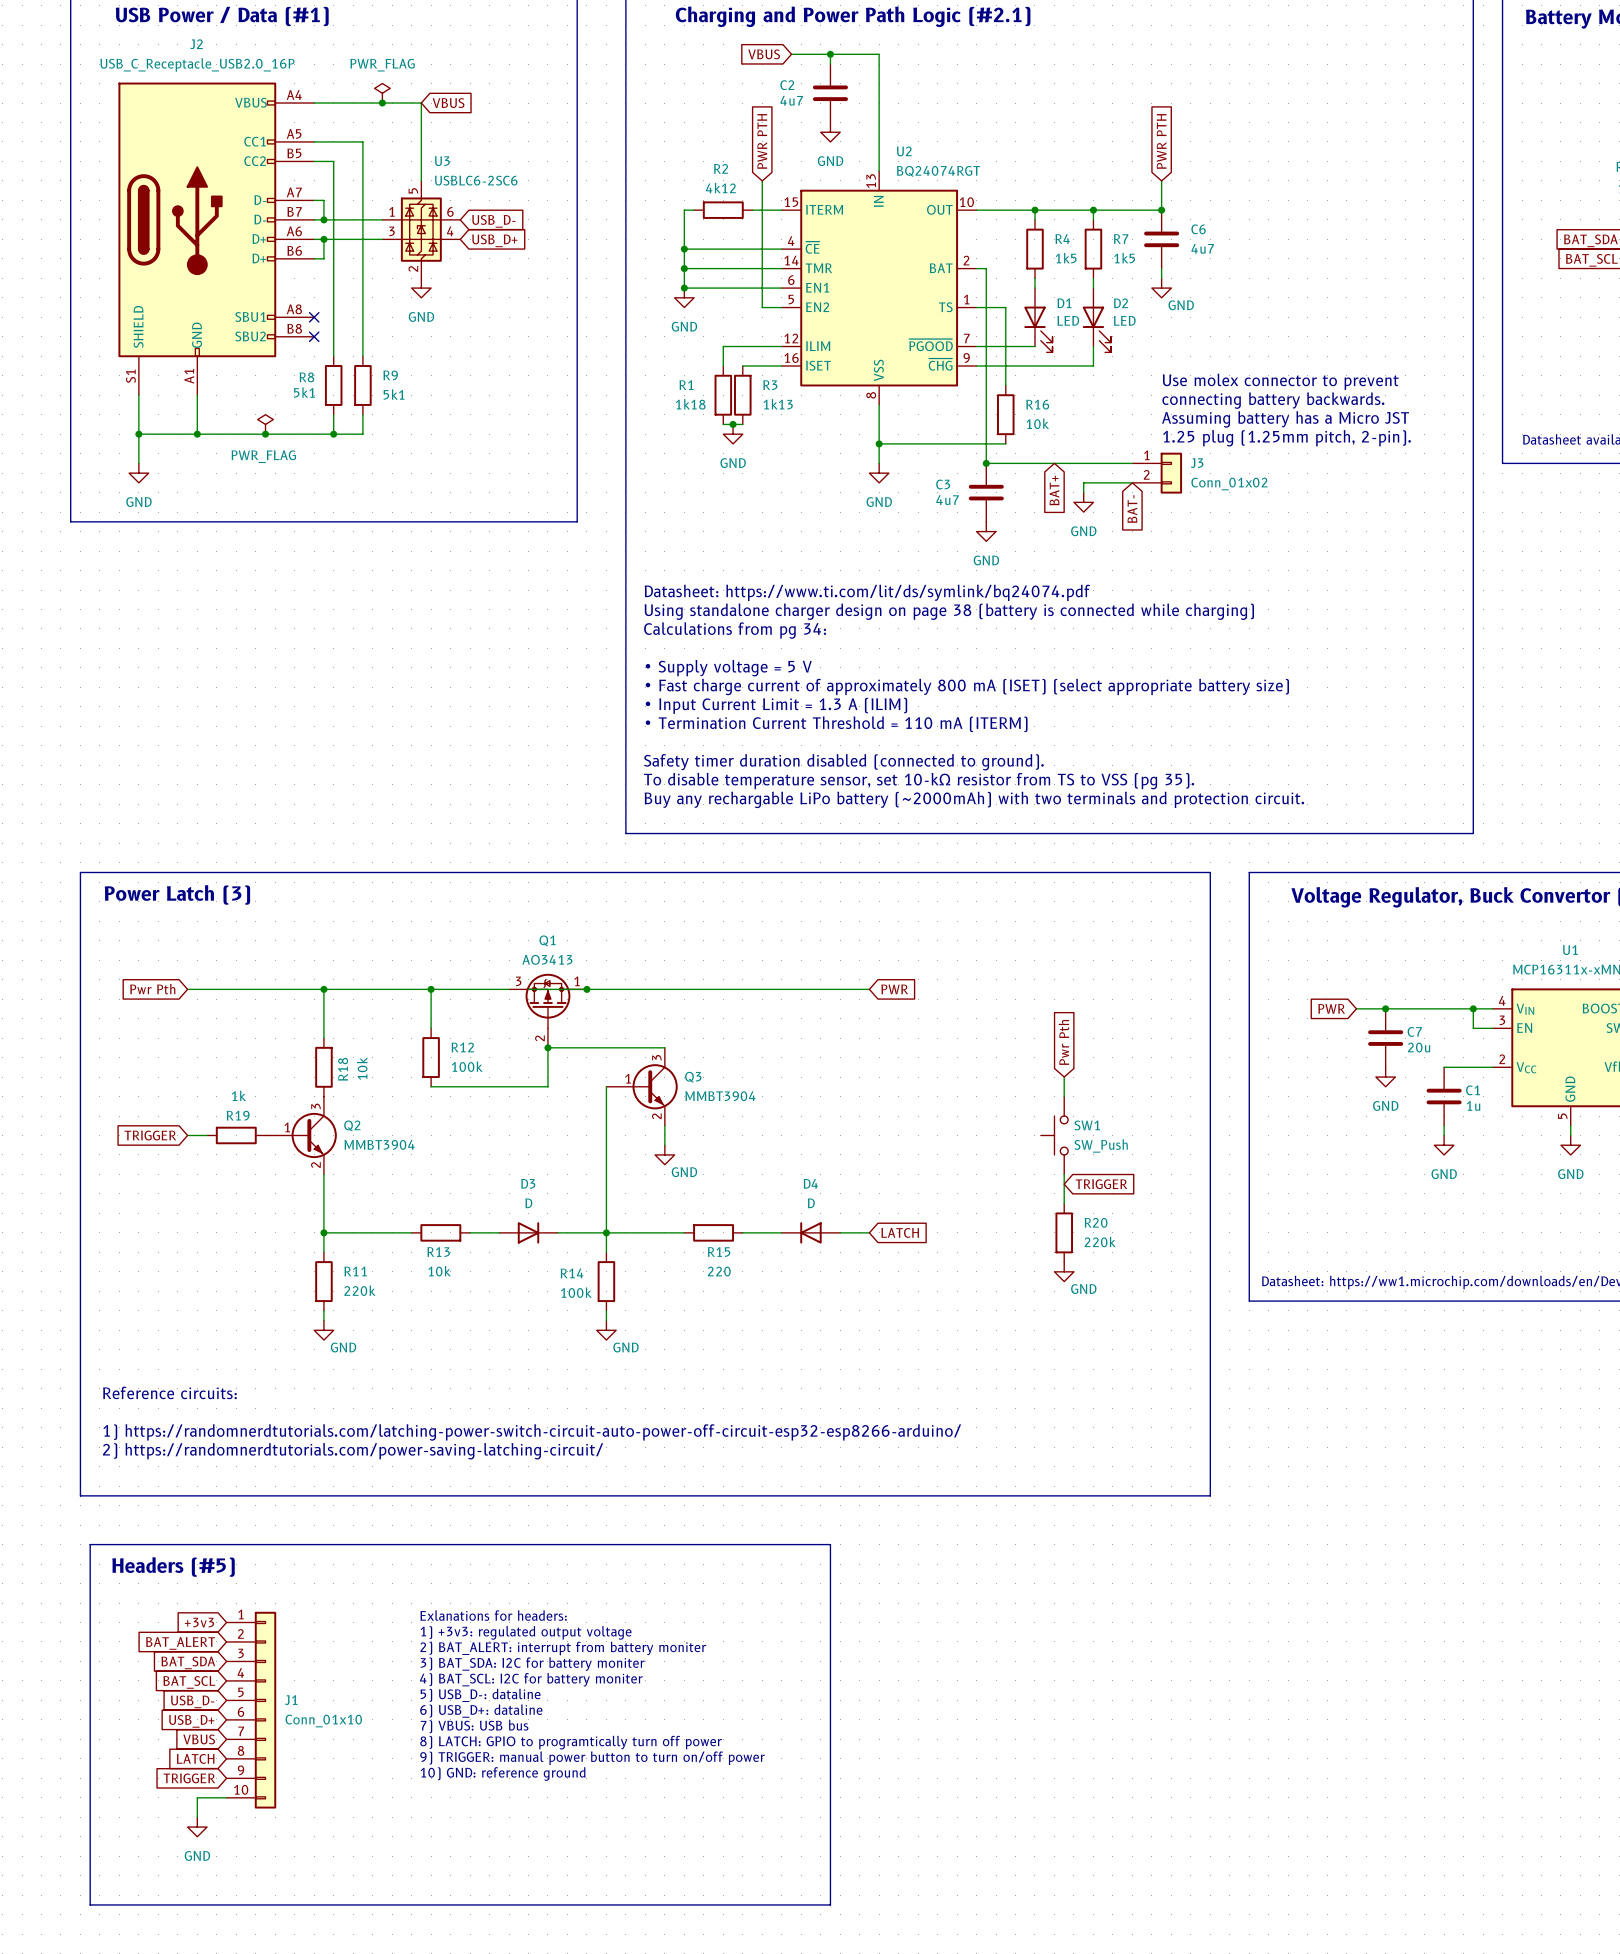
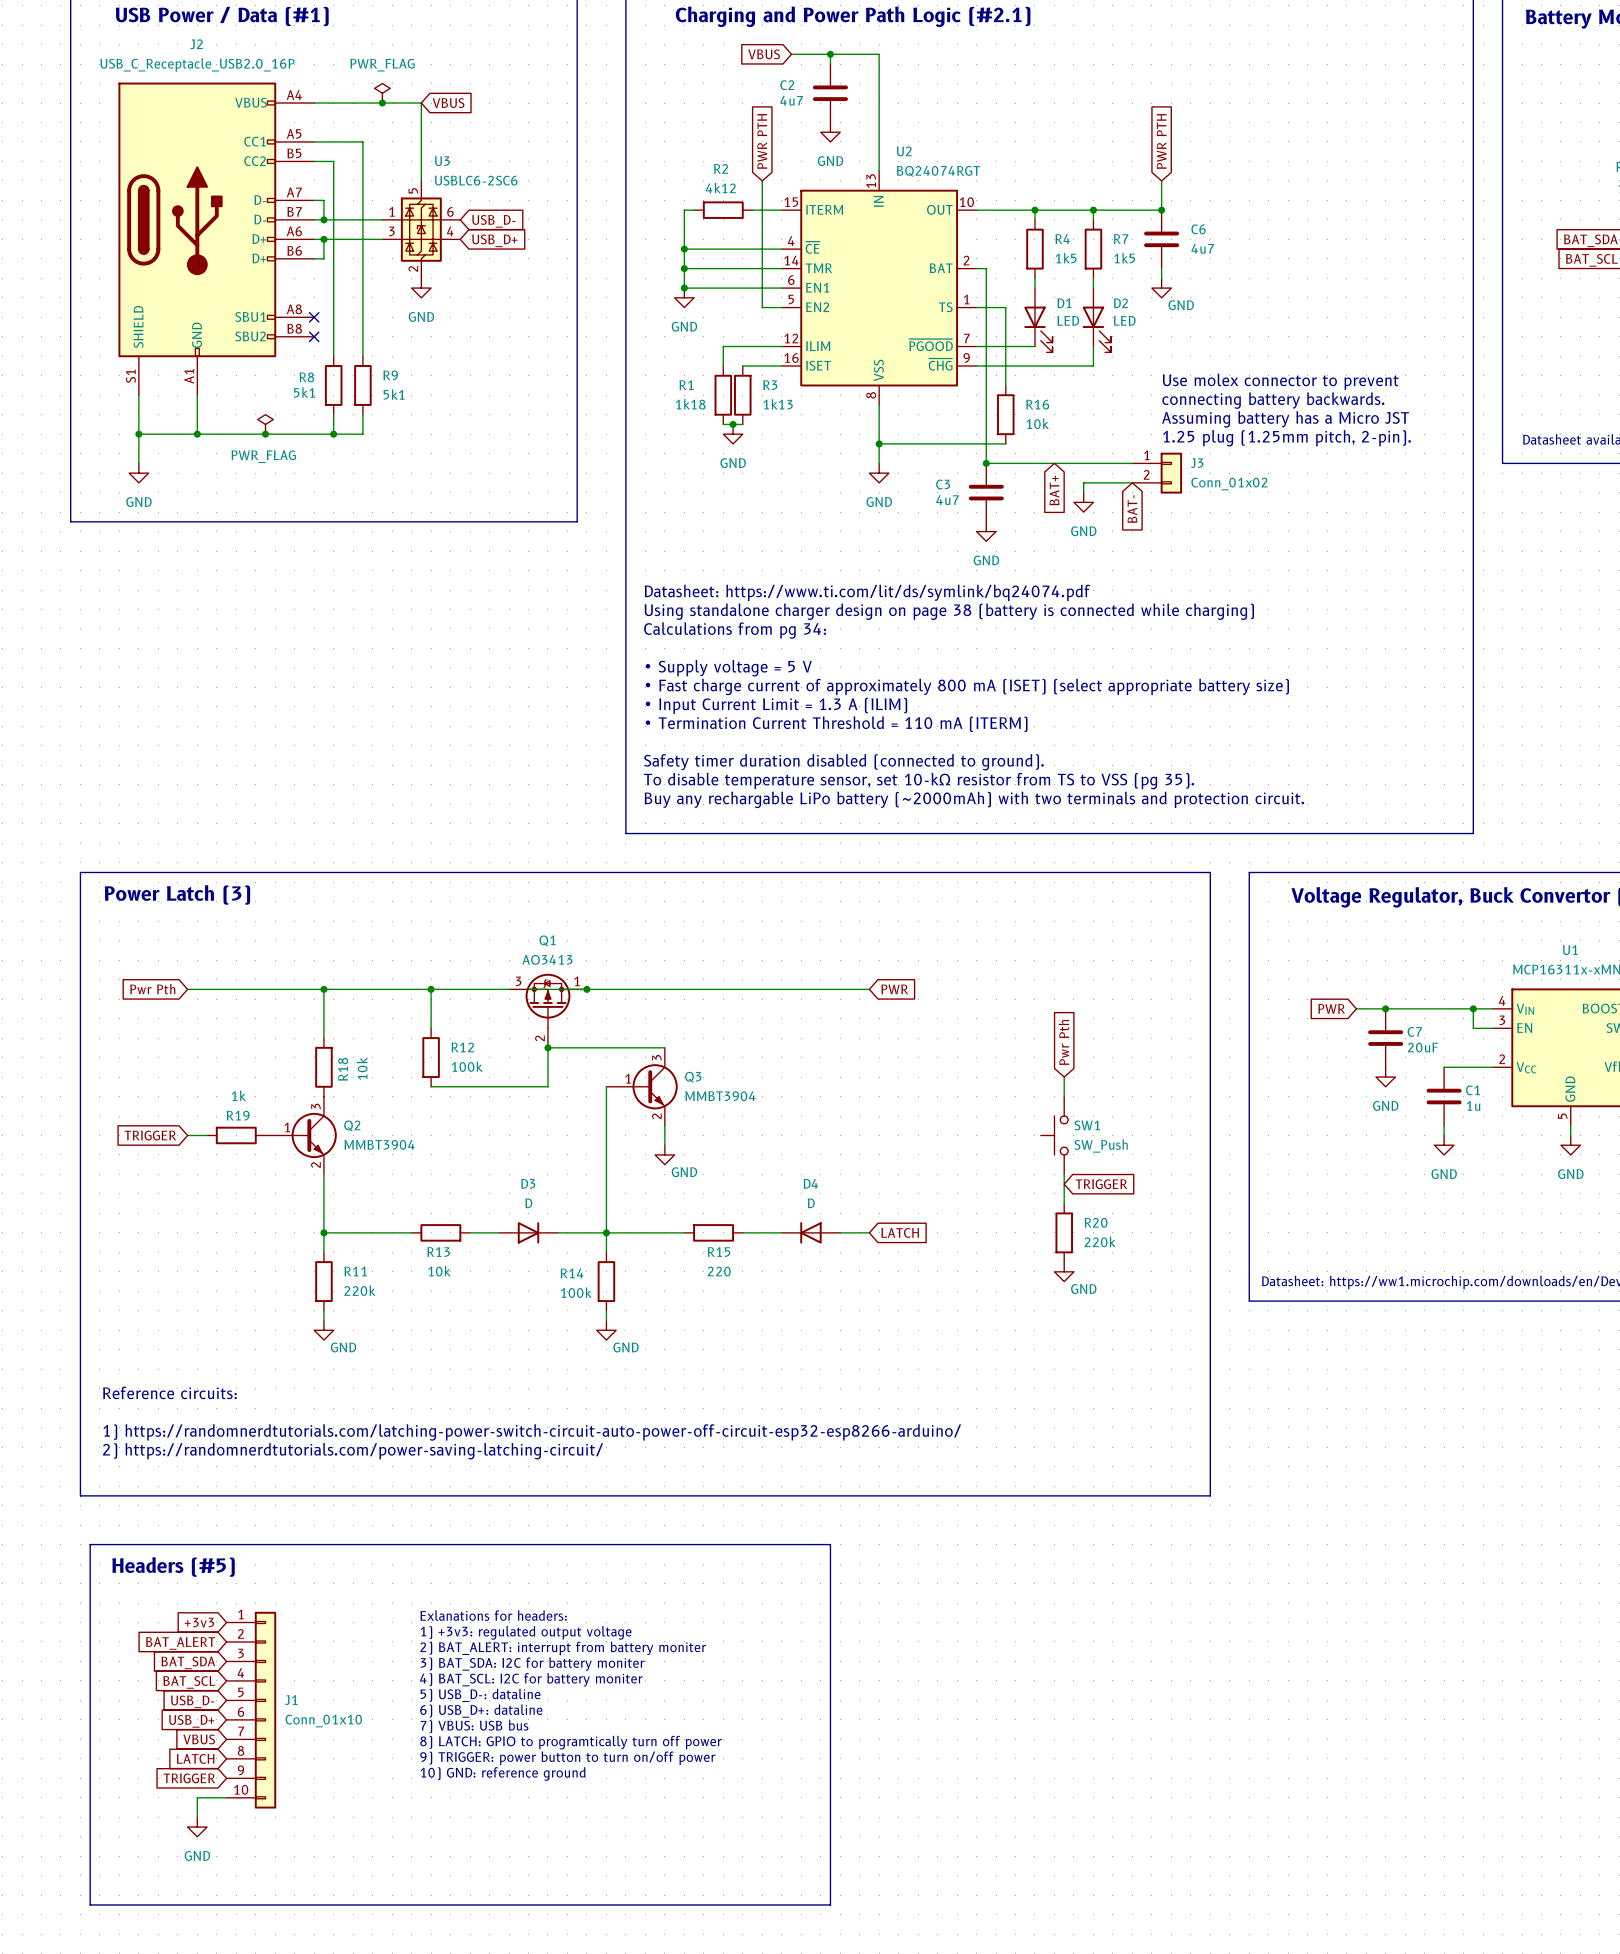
C7 value: 20u (1419, 1047) -> 20uF (1423, 1047)
text: 9) TRIGGER: manual power button to turn on/off power (592, 1758) -> 9) TRIGGER: power button to turn on/off power (567, 1758)

